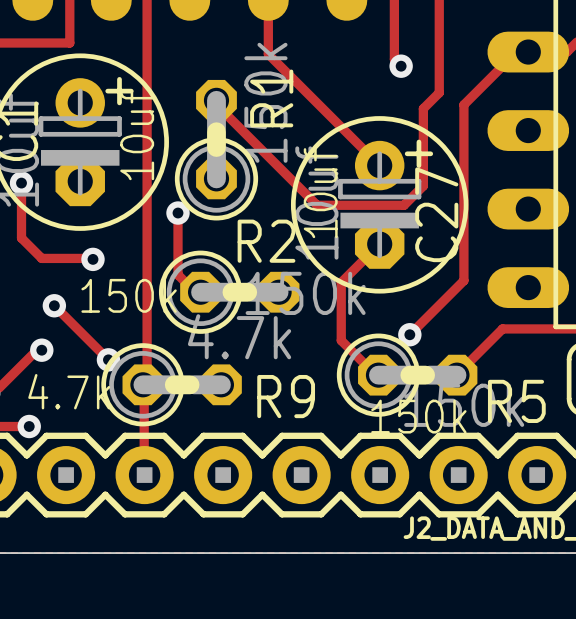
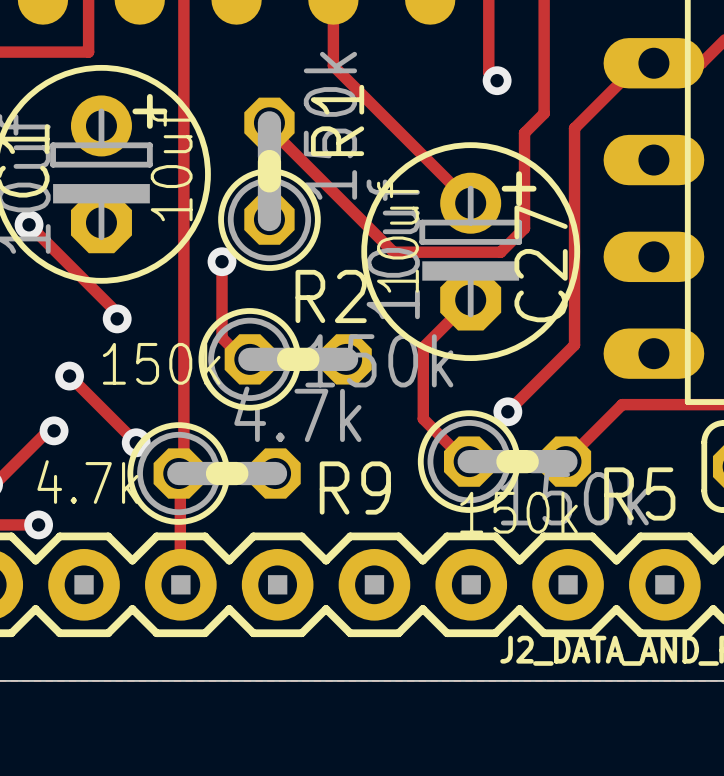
track: (21, 183) (21, 238) (41, 258) (92, 259) -> (29, 224) (117, 312) (117, 318)

